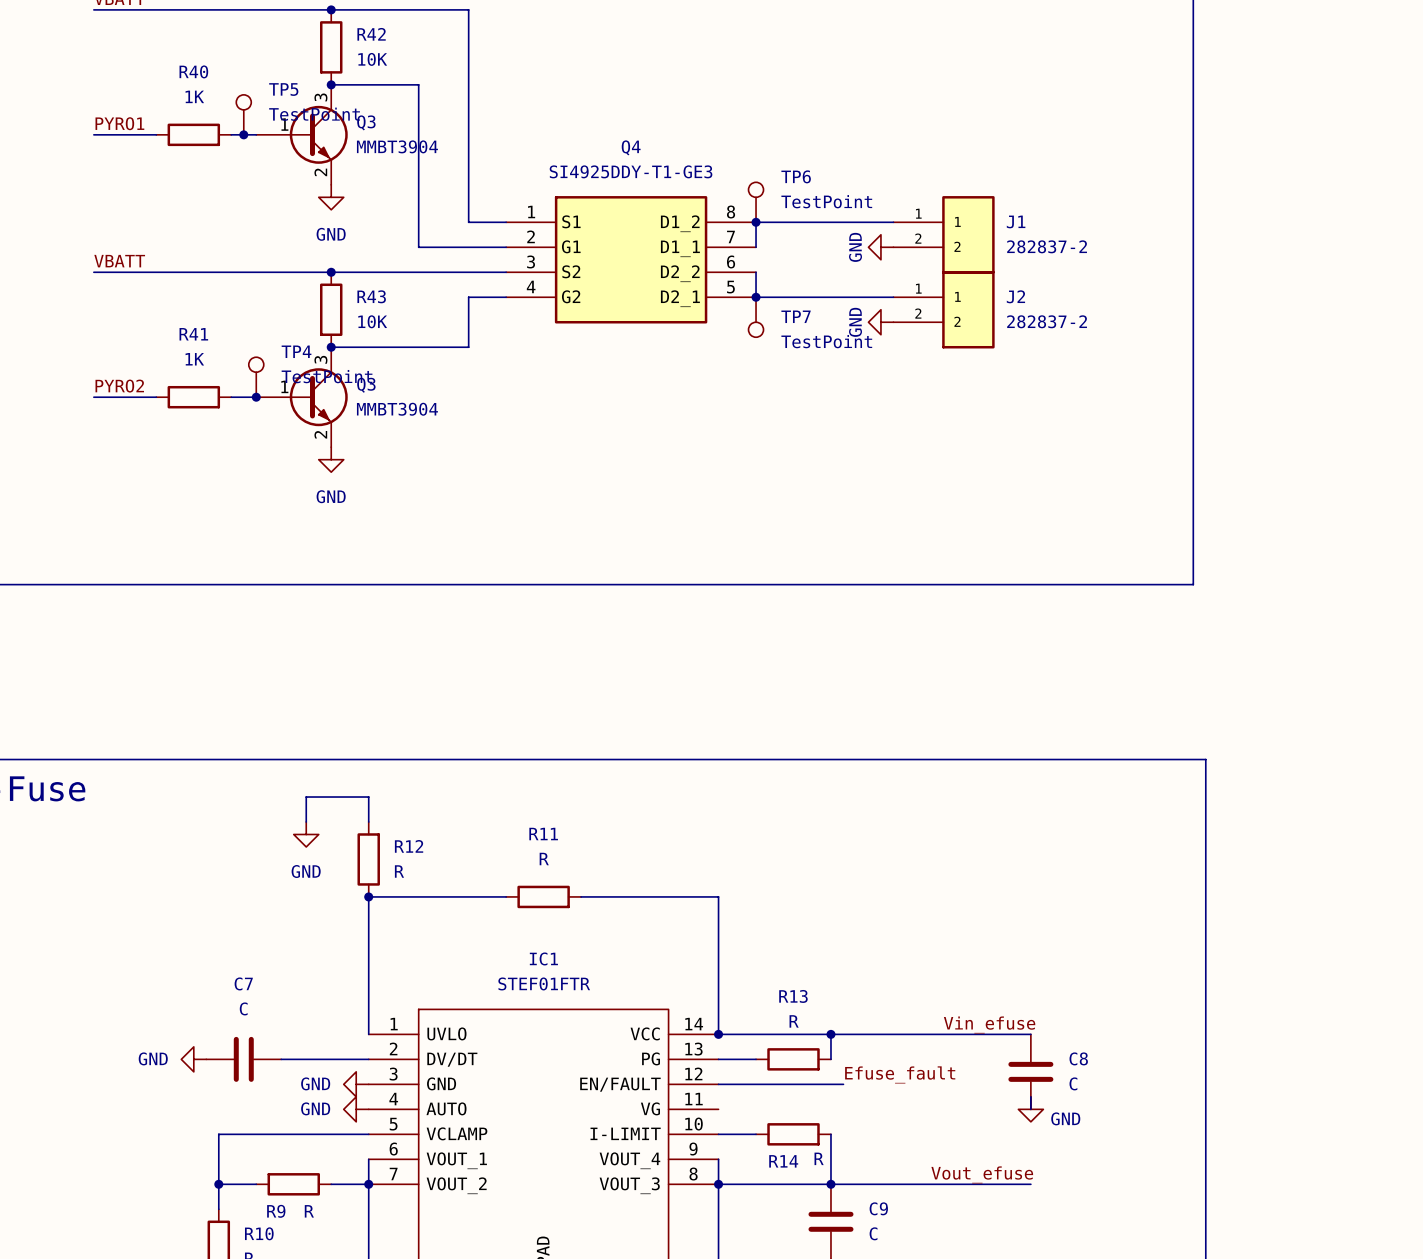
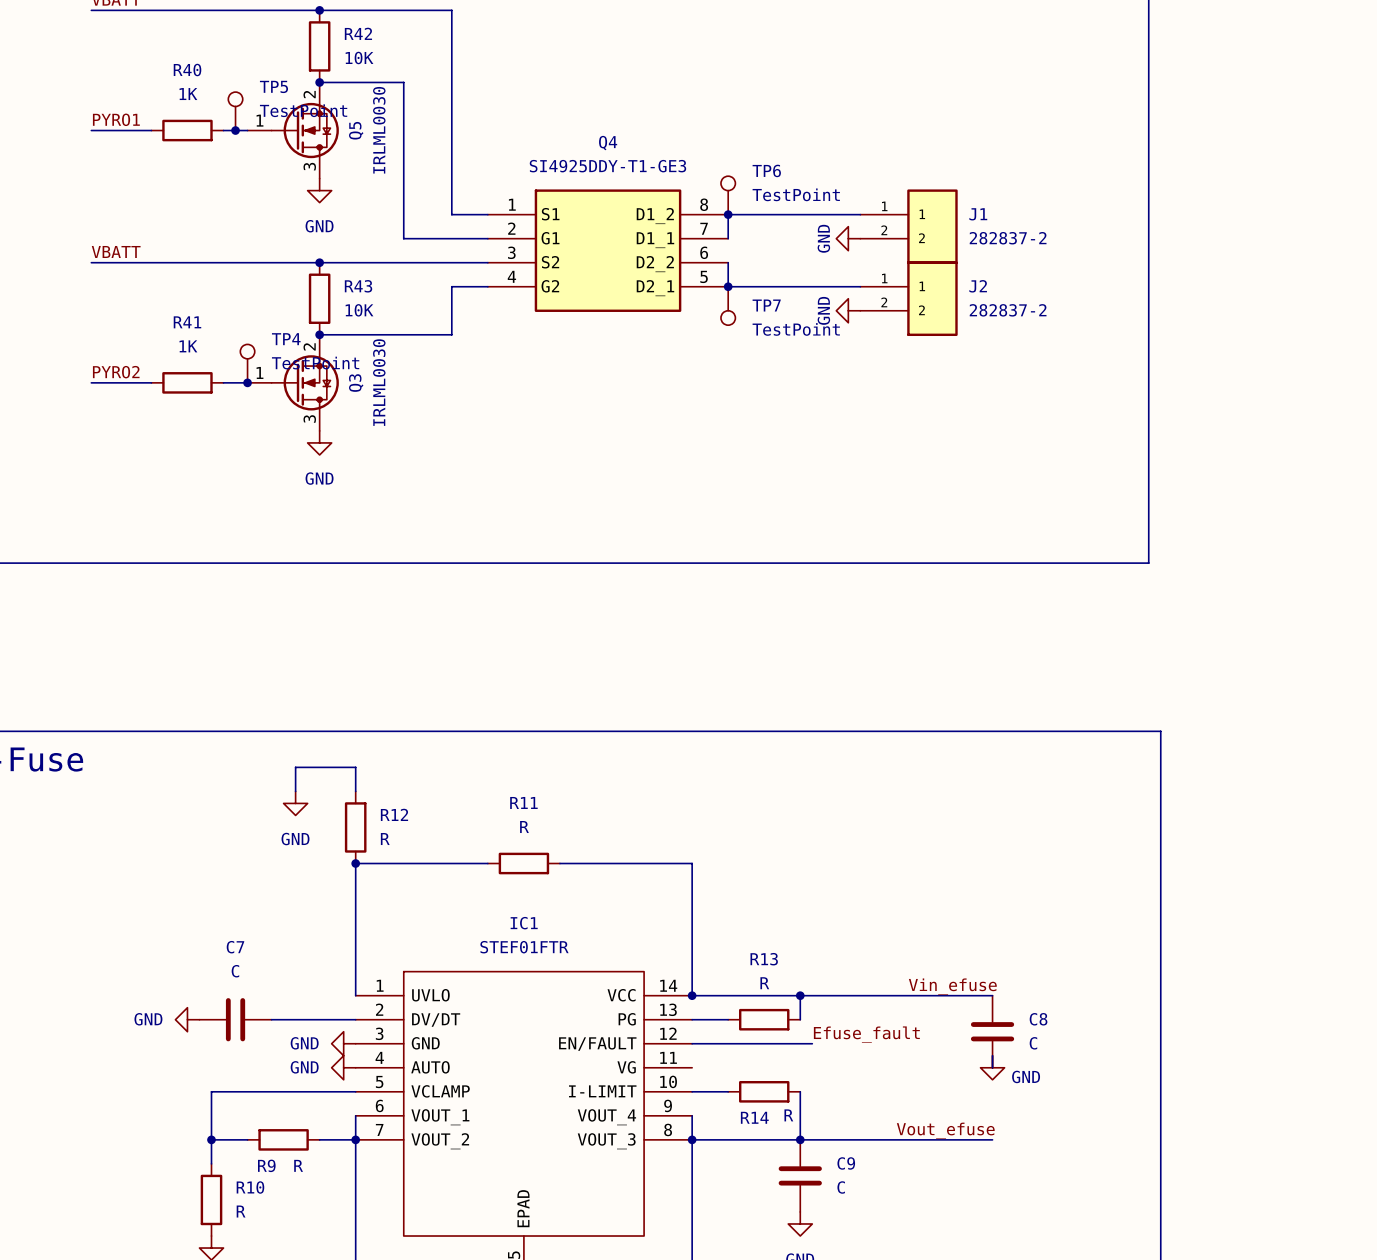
Q3: MMBT3904 (302, 134) -> none
Q5: none -> IRLML0030 (293, 130)
Q3 symbol: [256, 347, 348, 448] -> [247, 334, 339, 431]
Q3 value: MMBT3904 (397, 409) -> IRLML0030 (379, 382)

